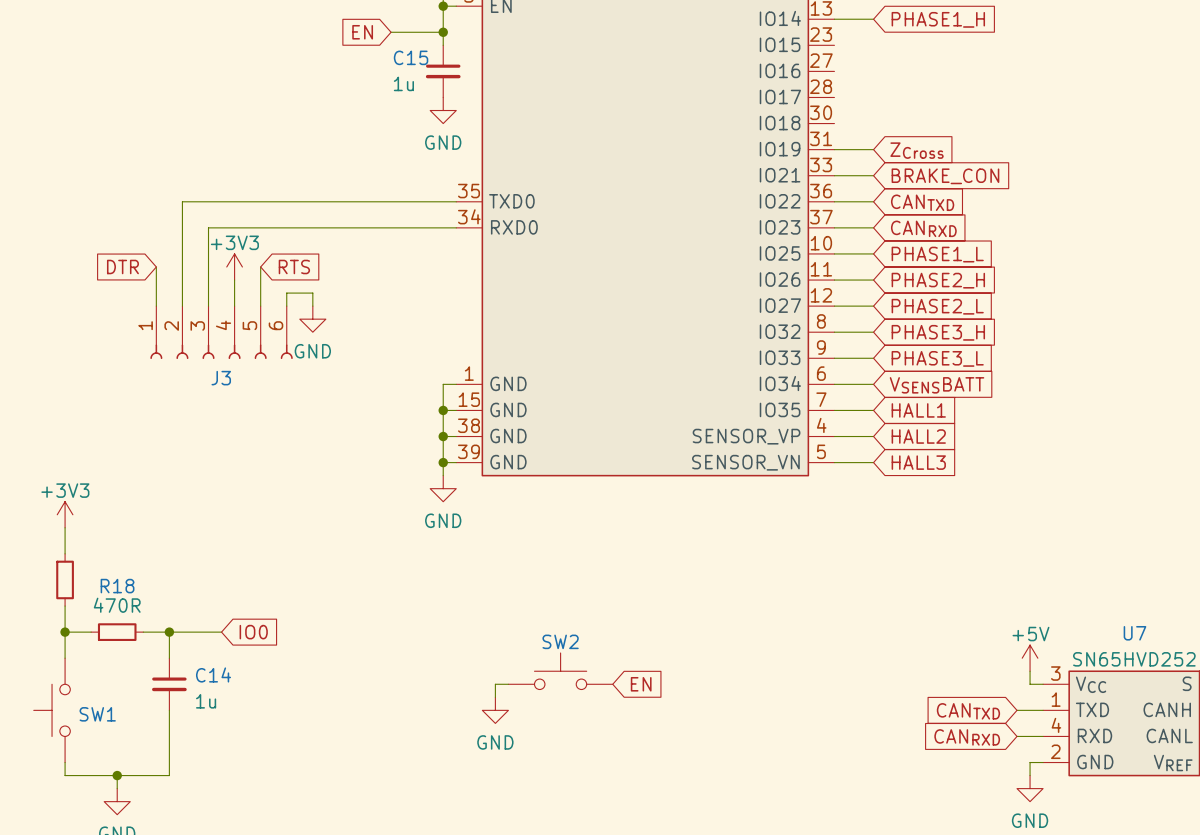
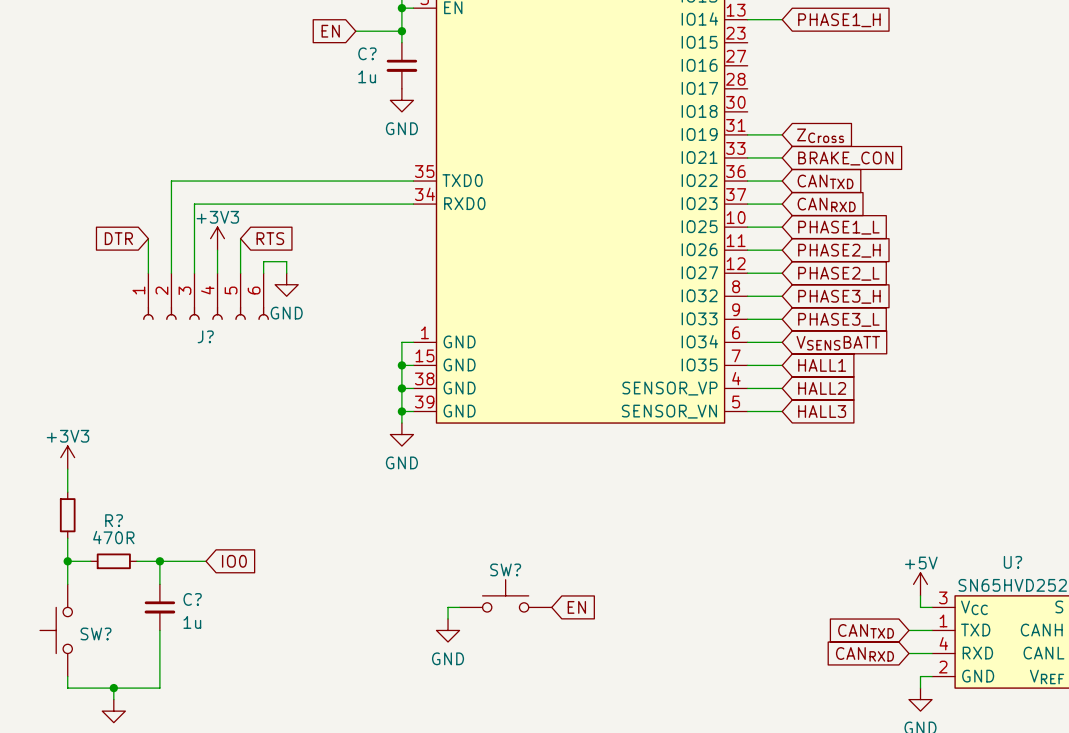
C15 name: C15 (411, 57) -> C? (367, 53)
J3 name: J3 (221, 378) -> J? (205, 336)
R18 name: R18 (117, 586) -> R? (114, 520)
U7 name: U7 (1134, 633) -> U? (1012, 562)
SW2 name: SW2 (560, 641) -> SW? (505, 569)
C14 name: C14 (213, 674) -> C? (192, 599)
SW1 name: SW1 (97, 714) -> SW? (96, 633)

